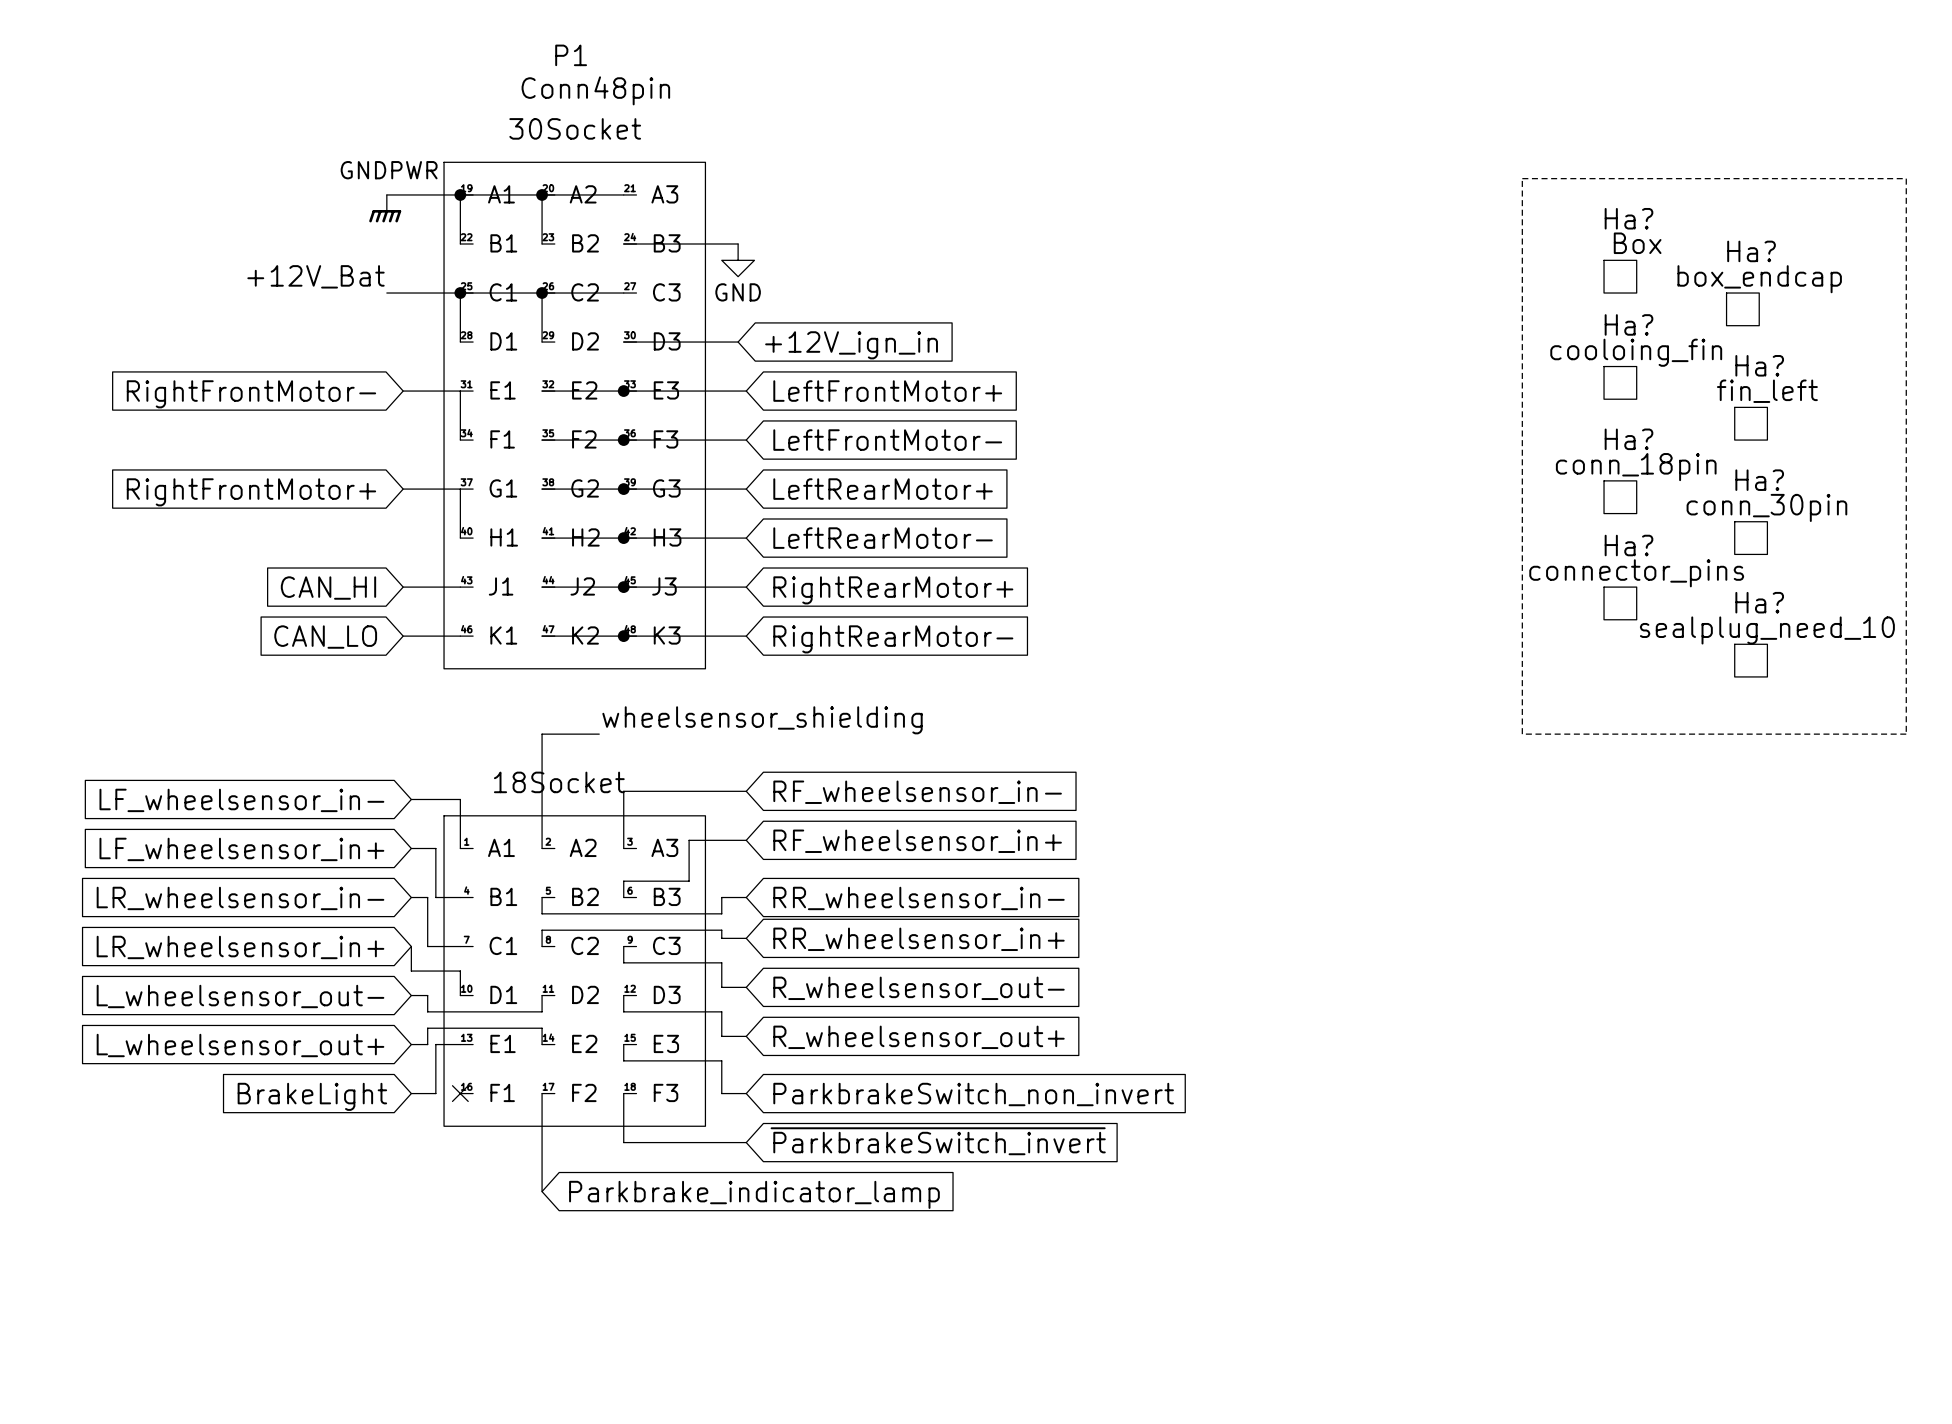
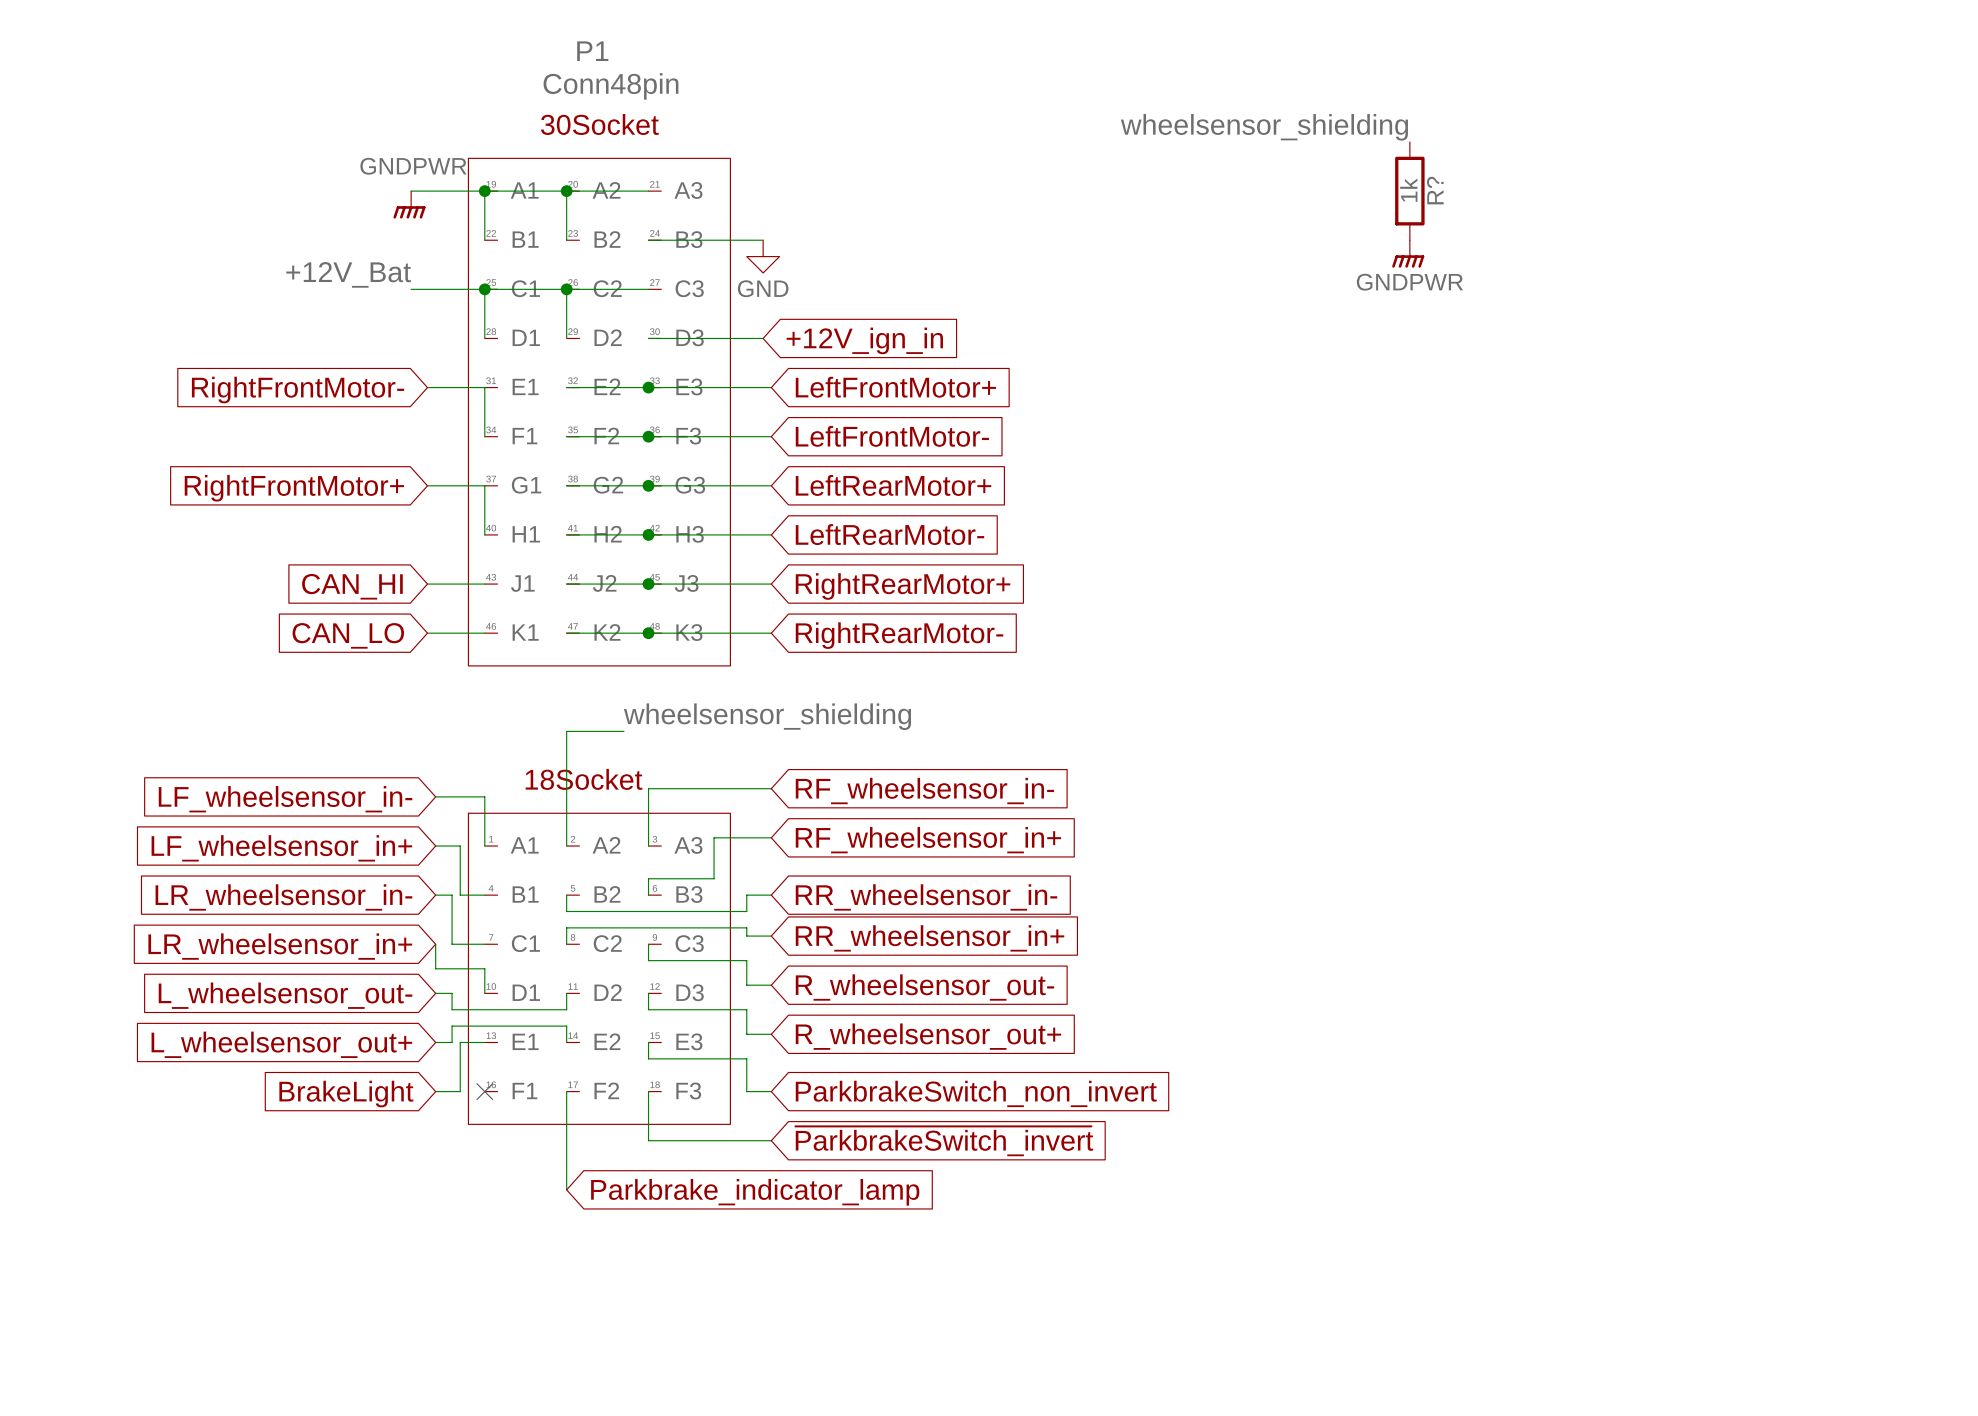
label: none -> wheelsensor_shielding (1264, 127)
line: (1522, 178) (1906, 178) (1906, 734) (1522, 734) (1522, 178) -> none
R?: none -> 1k (1409, 191)
power symbol: none -> GNDPWR (1408, 253)
Ha?: Box (1620, 276) -> none
Ha?: box_endcap (1742, 309) -> none
Ha?: cooloing_fin (1620, 382) -> none
Ha?: fin_left (1751, 423) -> none
Ha?: conn_18pin (1620, 497) -> none
Ha?: conn_30pin (1751, 538) -> none
Ha?: connector_pins (1620, 603) -> none
Ha?: sealplug_need_10 (1751, 660) -> none

